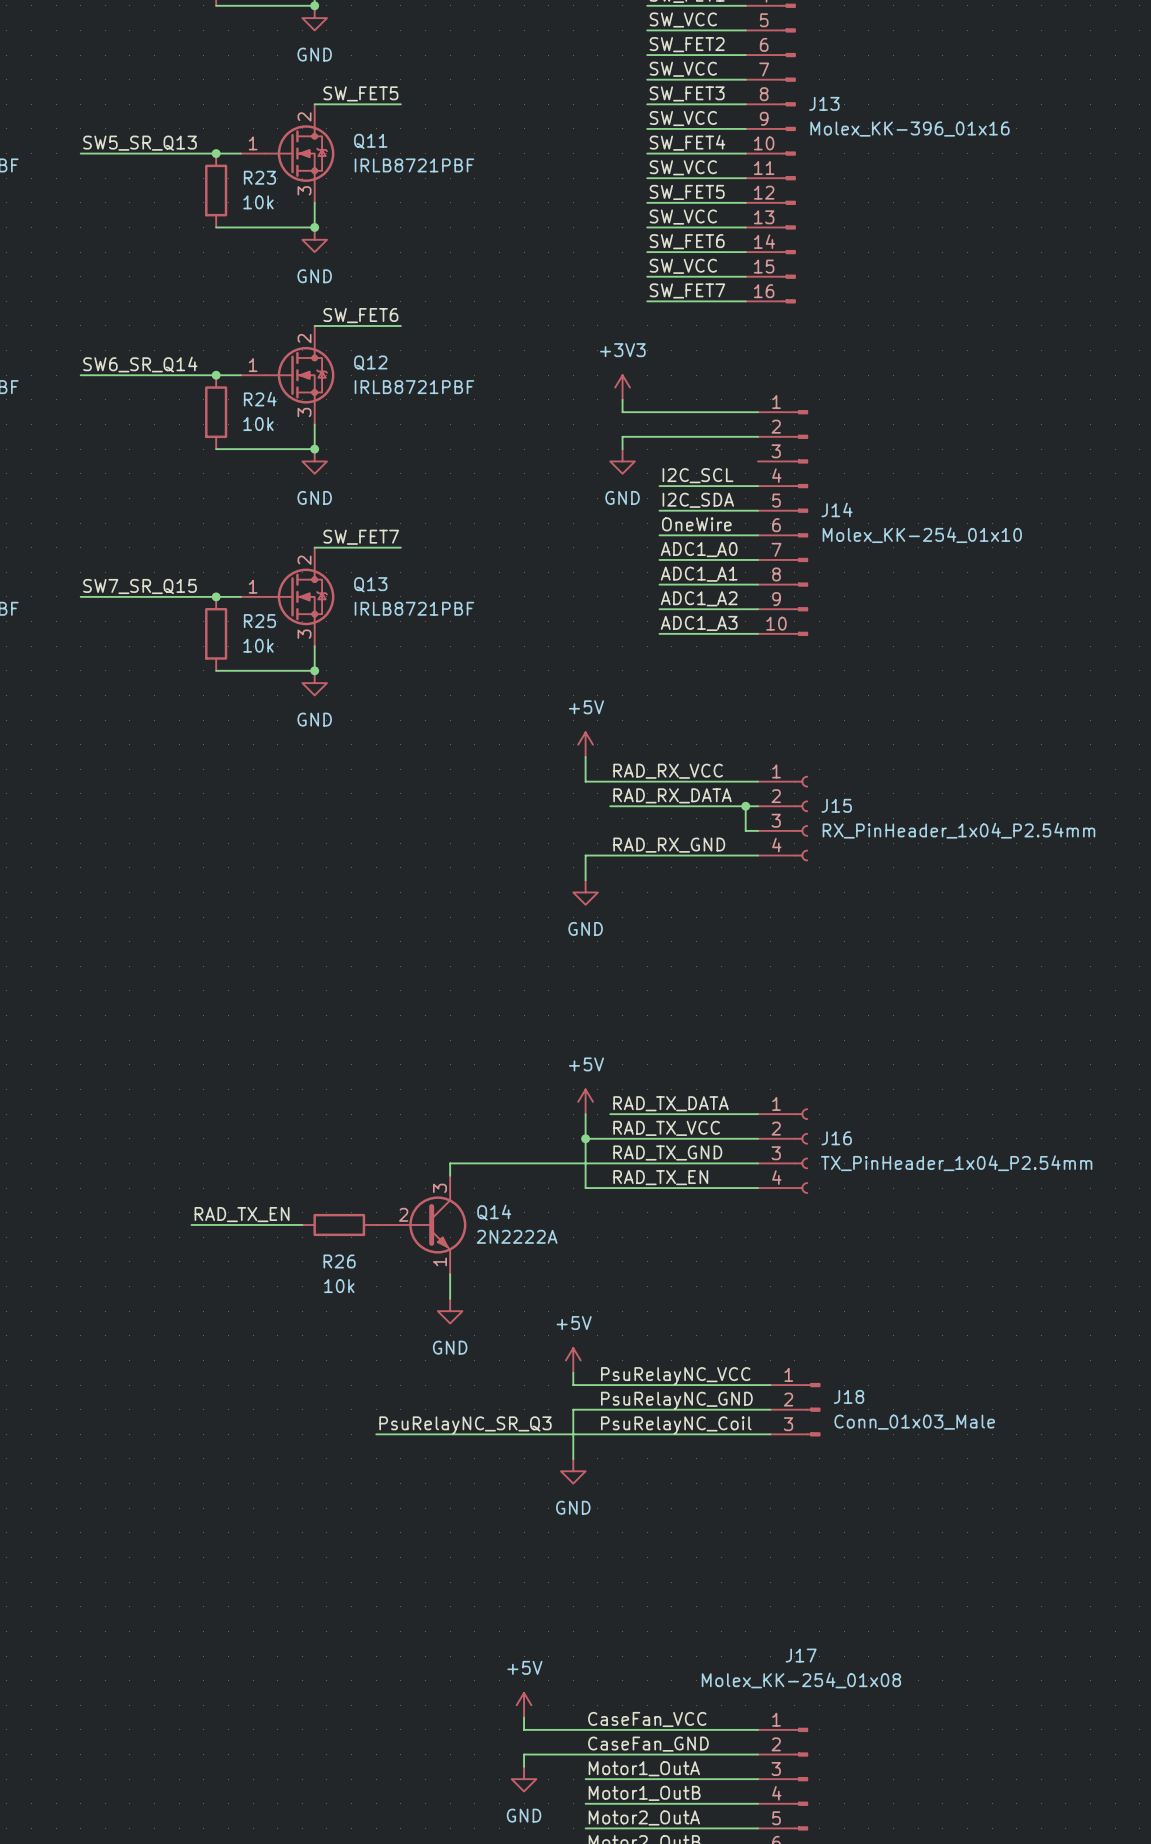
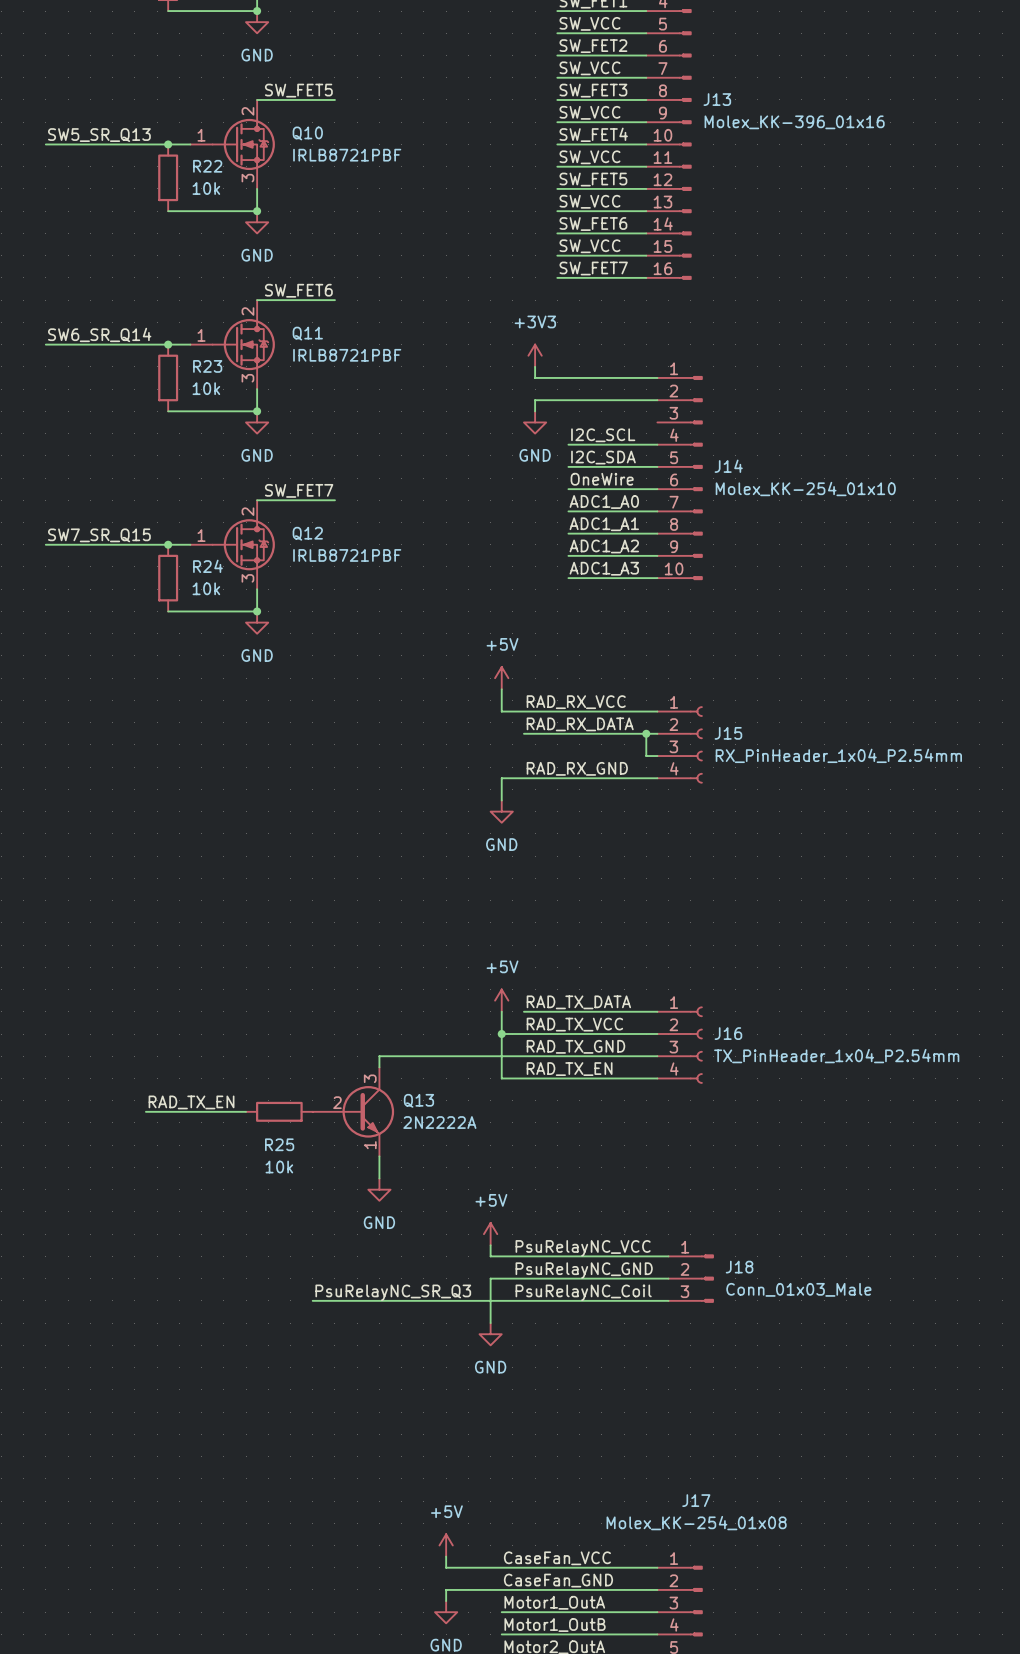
Q11 name: Q11 (370, 141) -> Q10 (307, 133)
R23 name: R23 (259, 177) -> R22 (207, 166)
Q12 name: Q12 (370, 363) -> Q11 (307, 333)
R24 name: R24 (260, 399) -> R23 (207, 366)
Q13 name: Q13 (370, 584) -> Q12 (307, 533)
R25 name: R25 (259, 621) -> R24 (207, 566)
Q14 name: Q14 (494, 1212) -> Q13 (418, 1100)
R26 name: R26 (339, 1261) -> R25 (279, 1144)

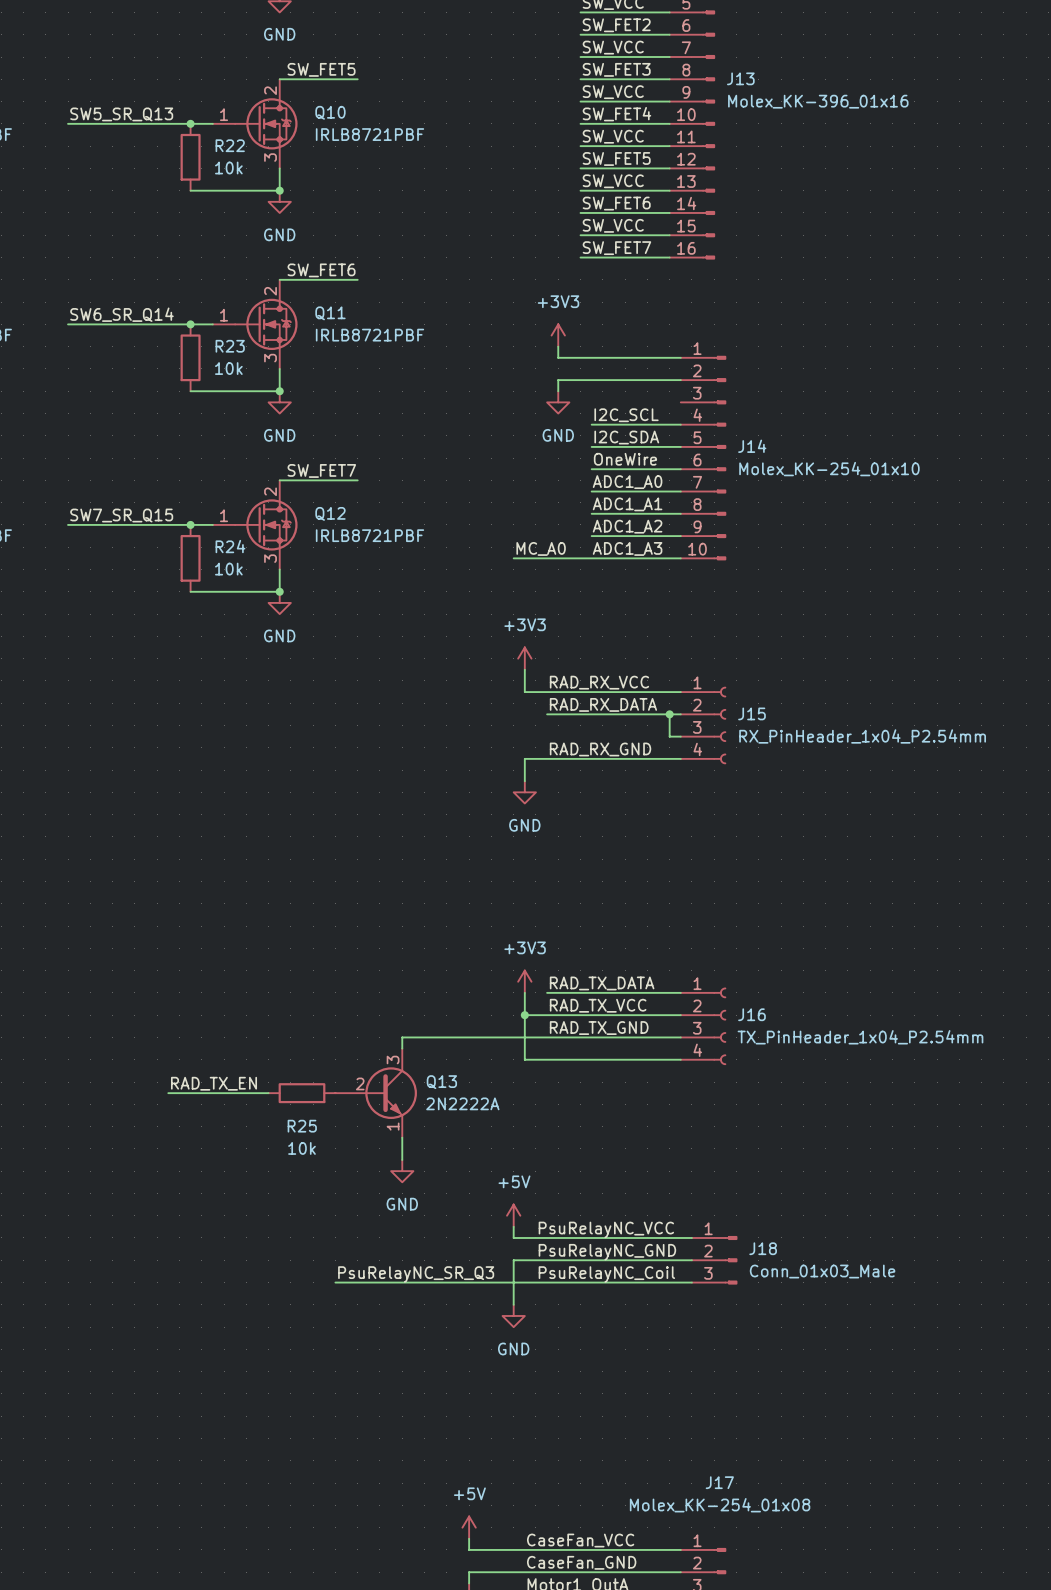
label: none -> MC_A0 (541, 548)
wire: none -> (513, 558) (591, 558)
power symbol: +5V (501, 678) -> +3V3 (524, 658)
power symbol: +5V (501, 1000) -> +3V3 (524, 981)
label: RAD_TX_EN (569, 1069) -> none

